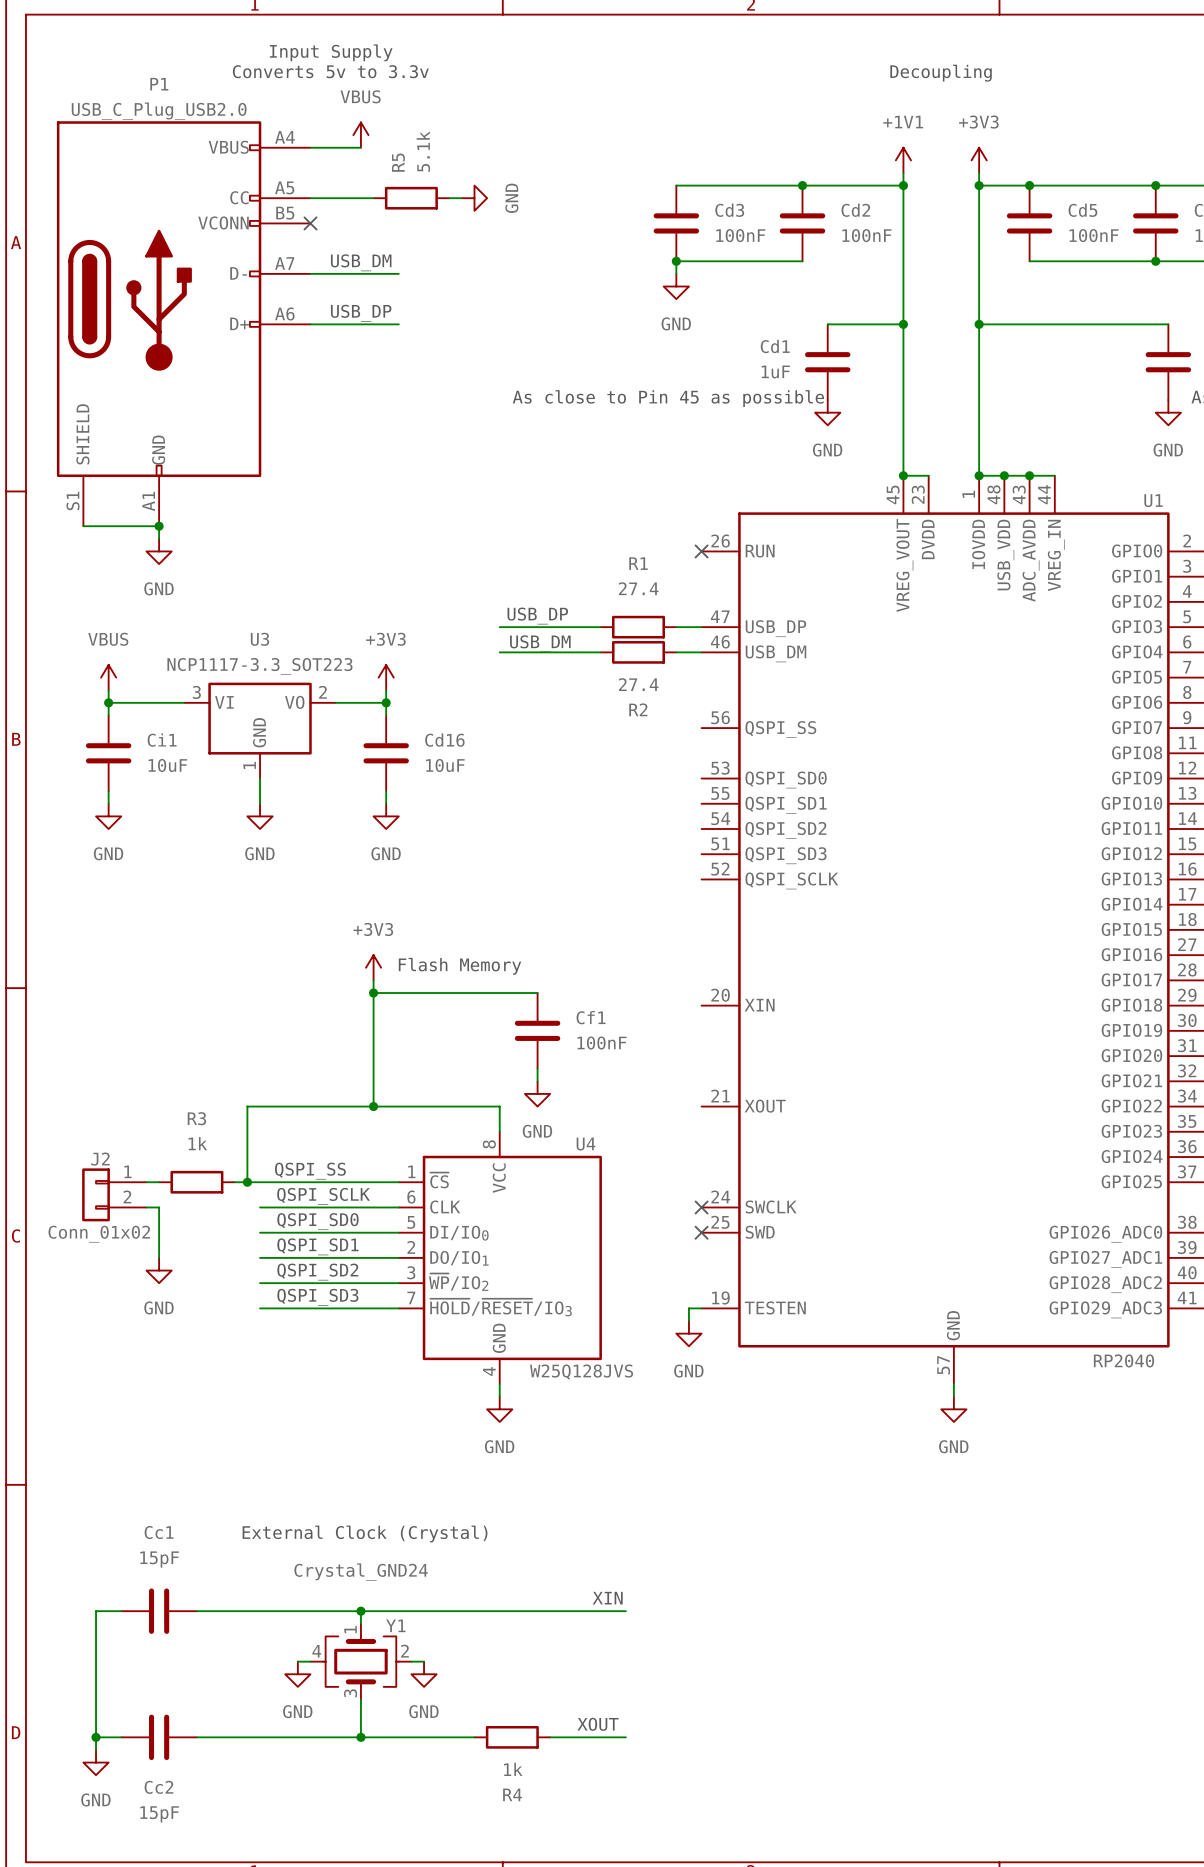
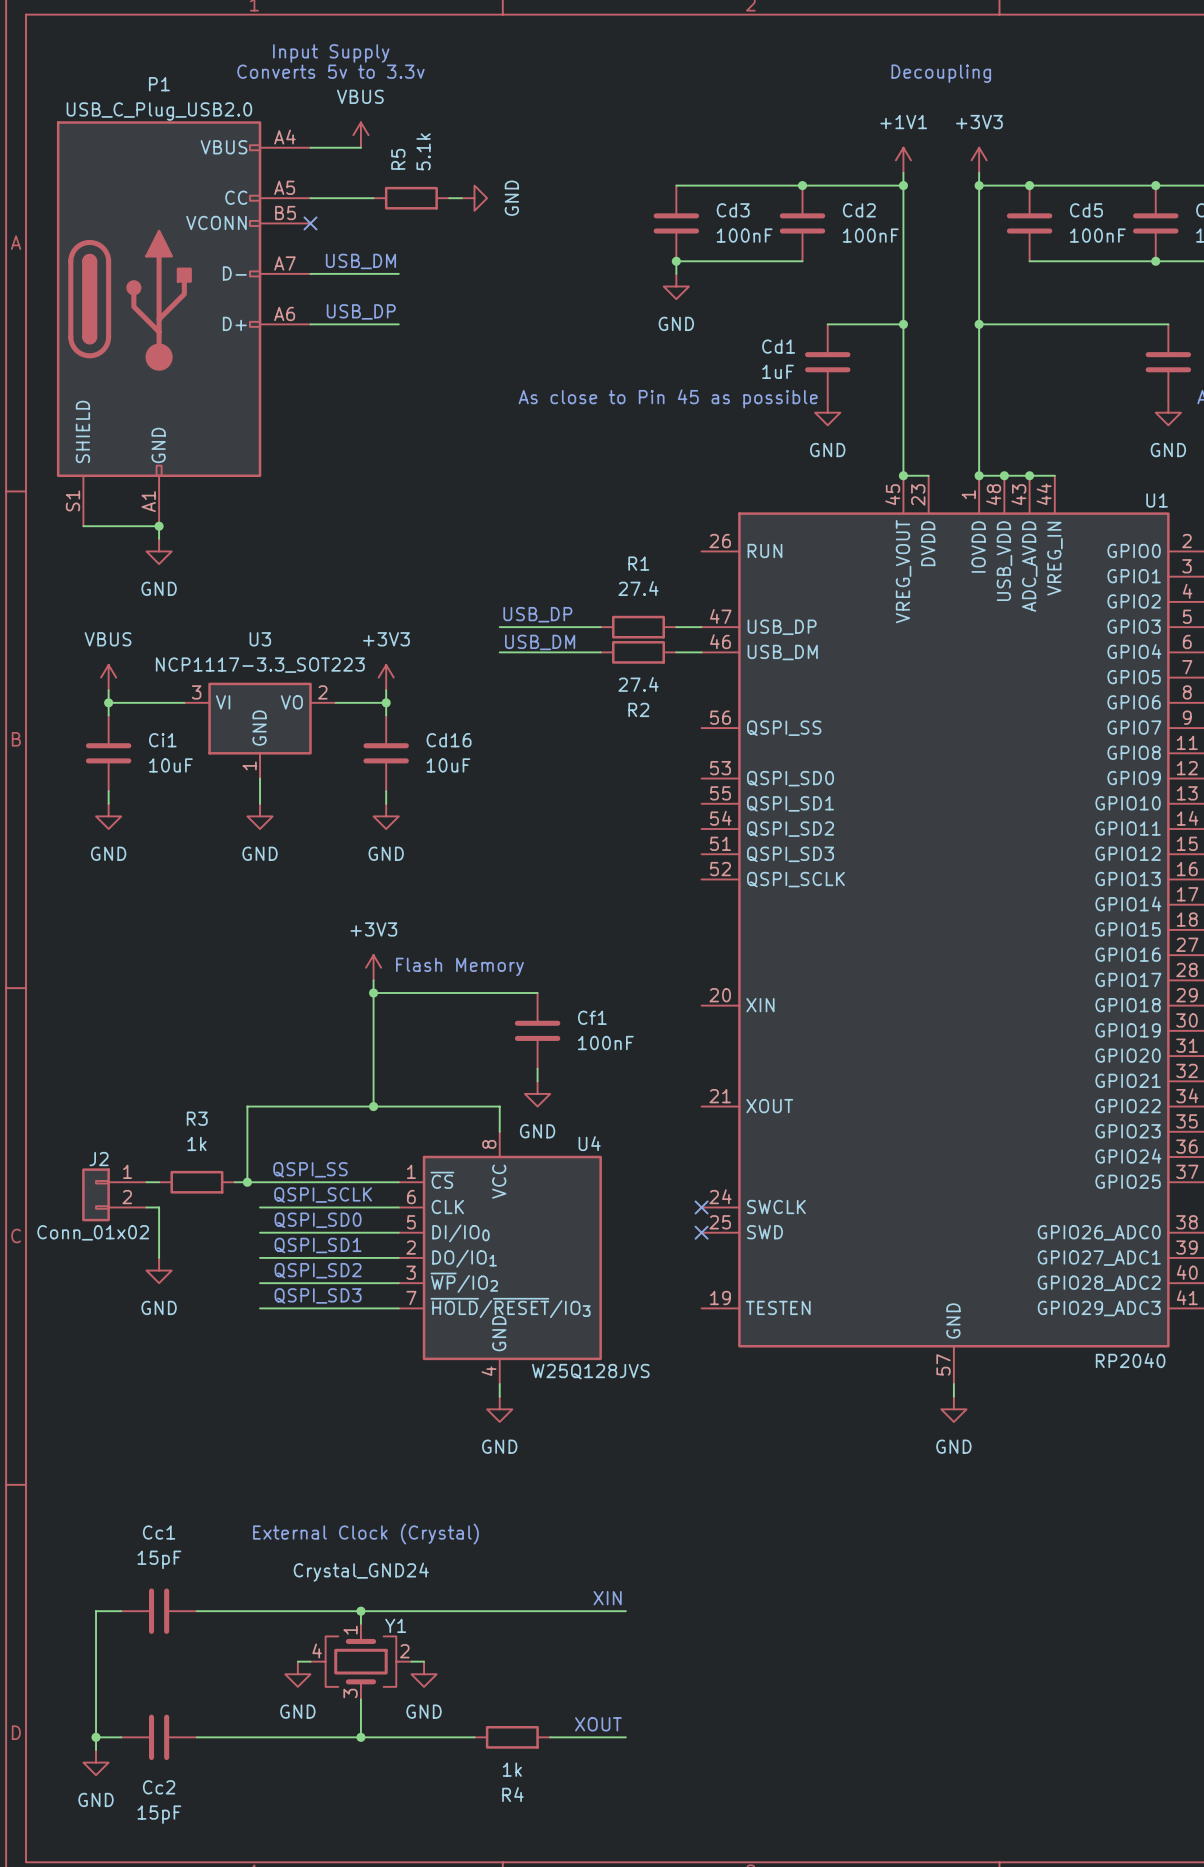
no-connect mark: (701, 551) -> none
wire: (701, 1308) (688, 1308) (688, 1321) -> none
power symbol: GND (688, 1333) -> none

